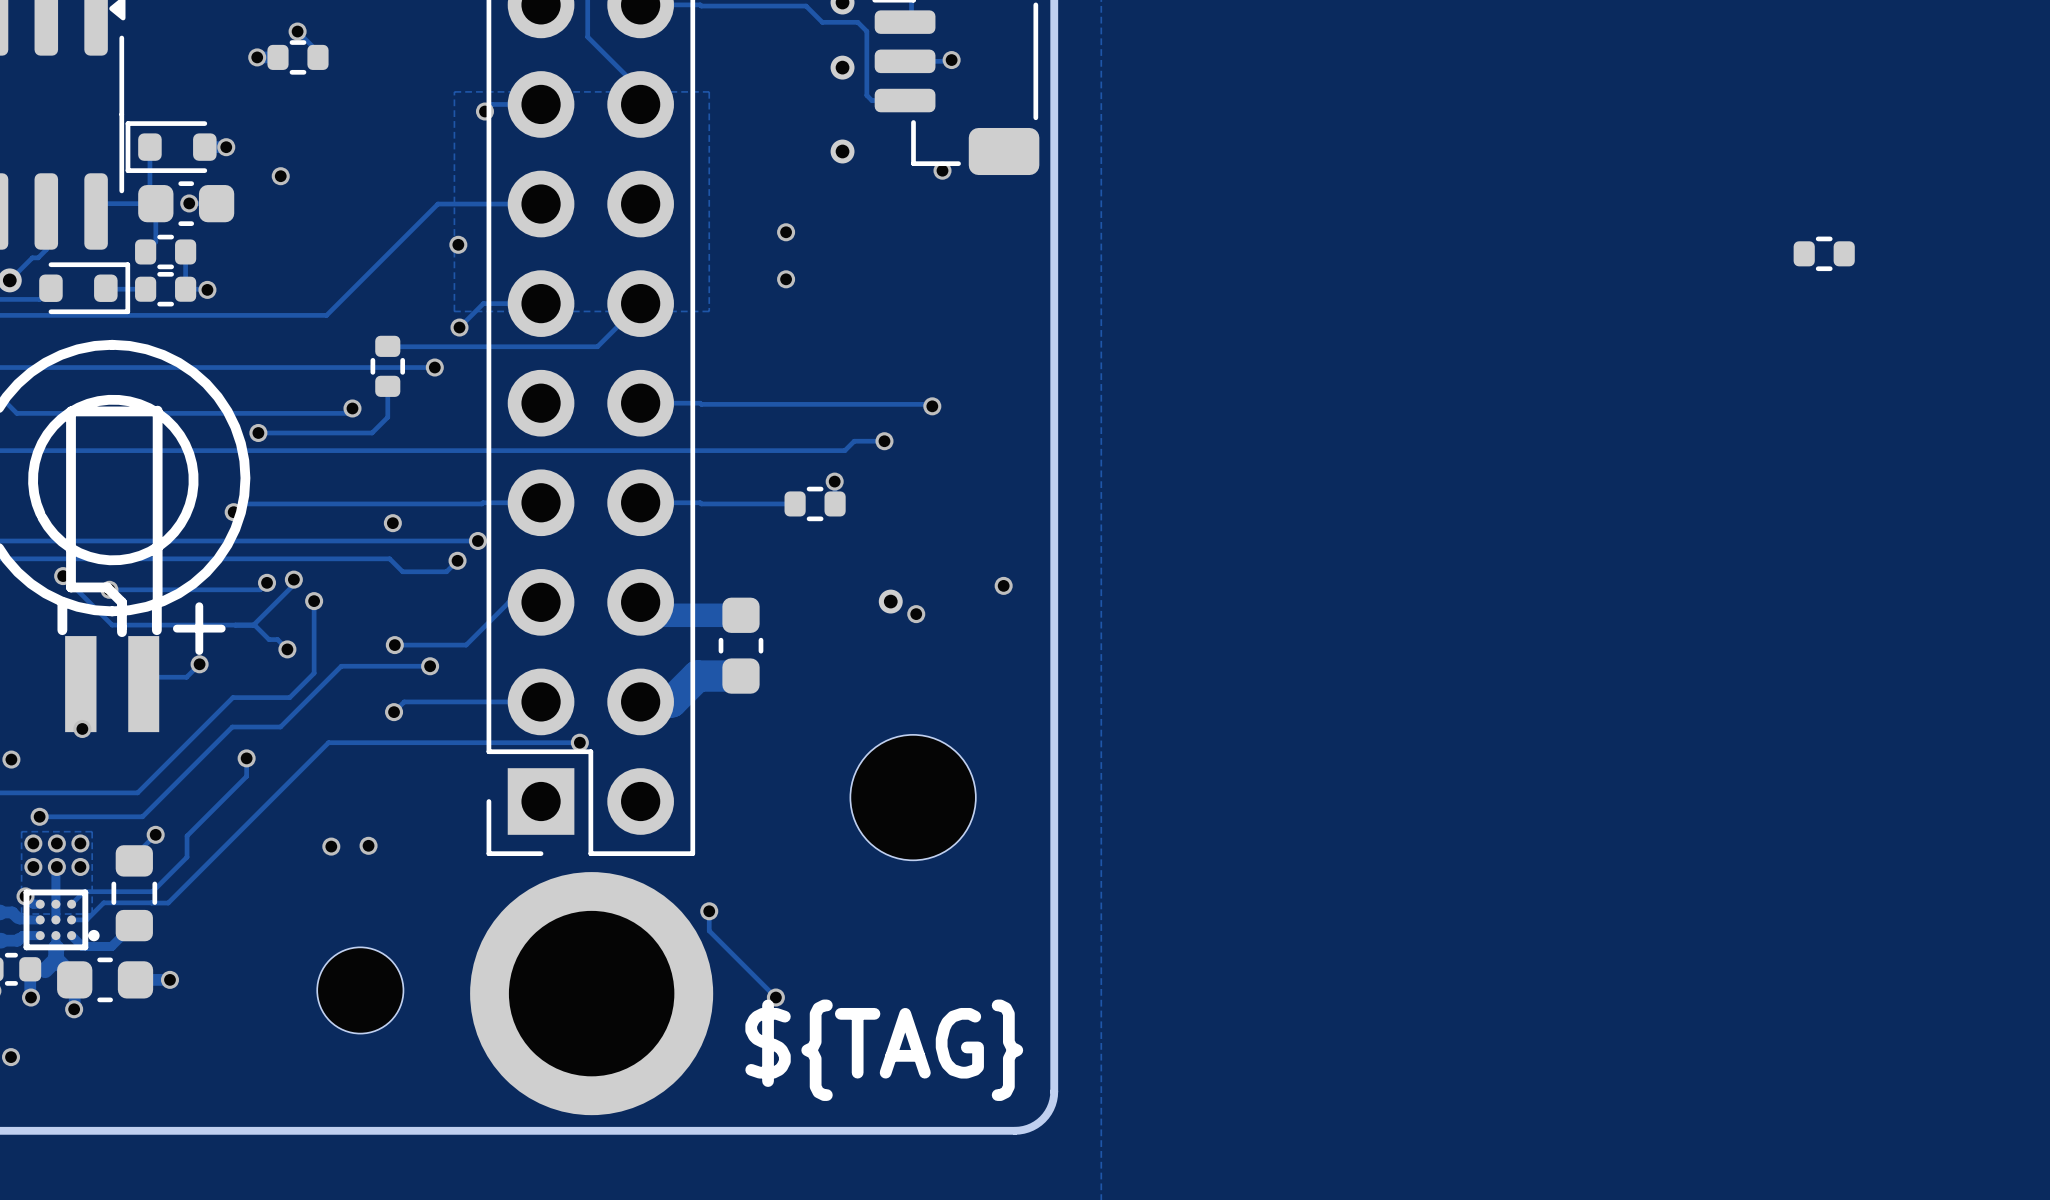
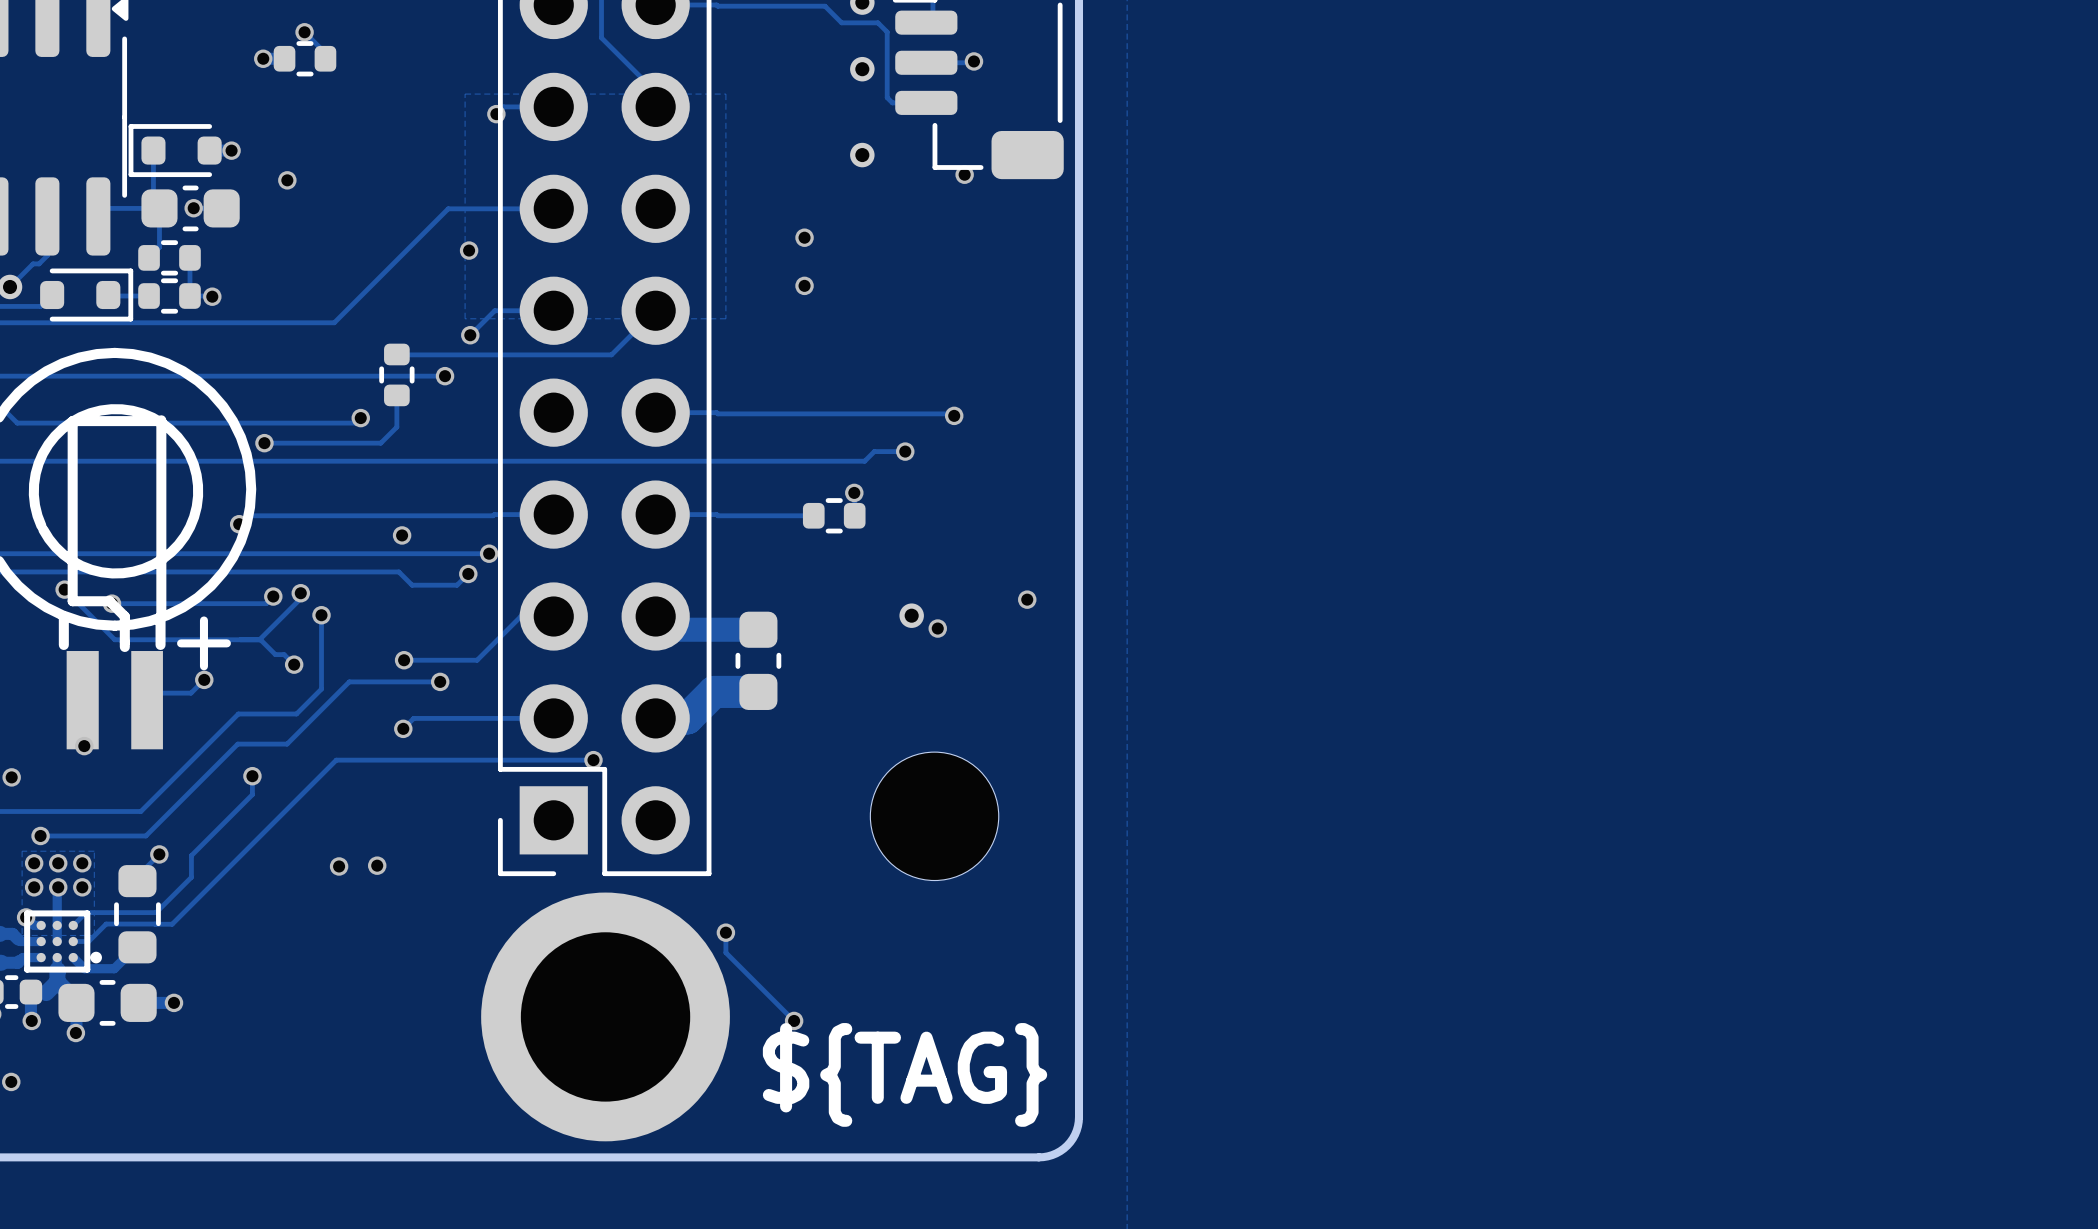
part: (1824, 253) -> none
part: (360, 990) -> none

